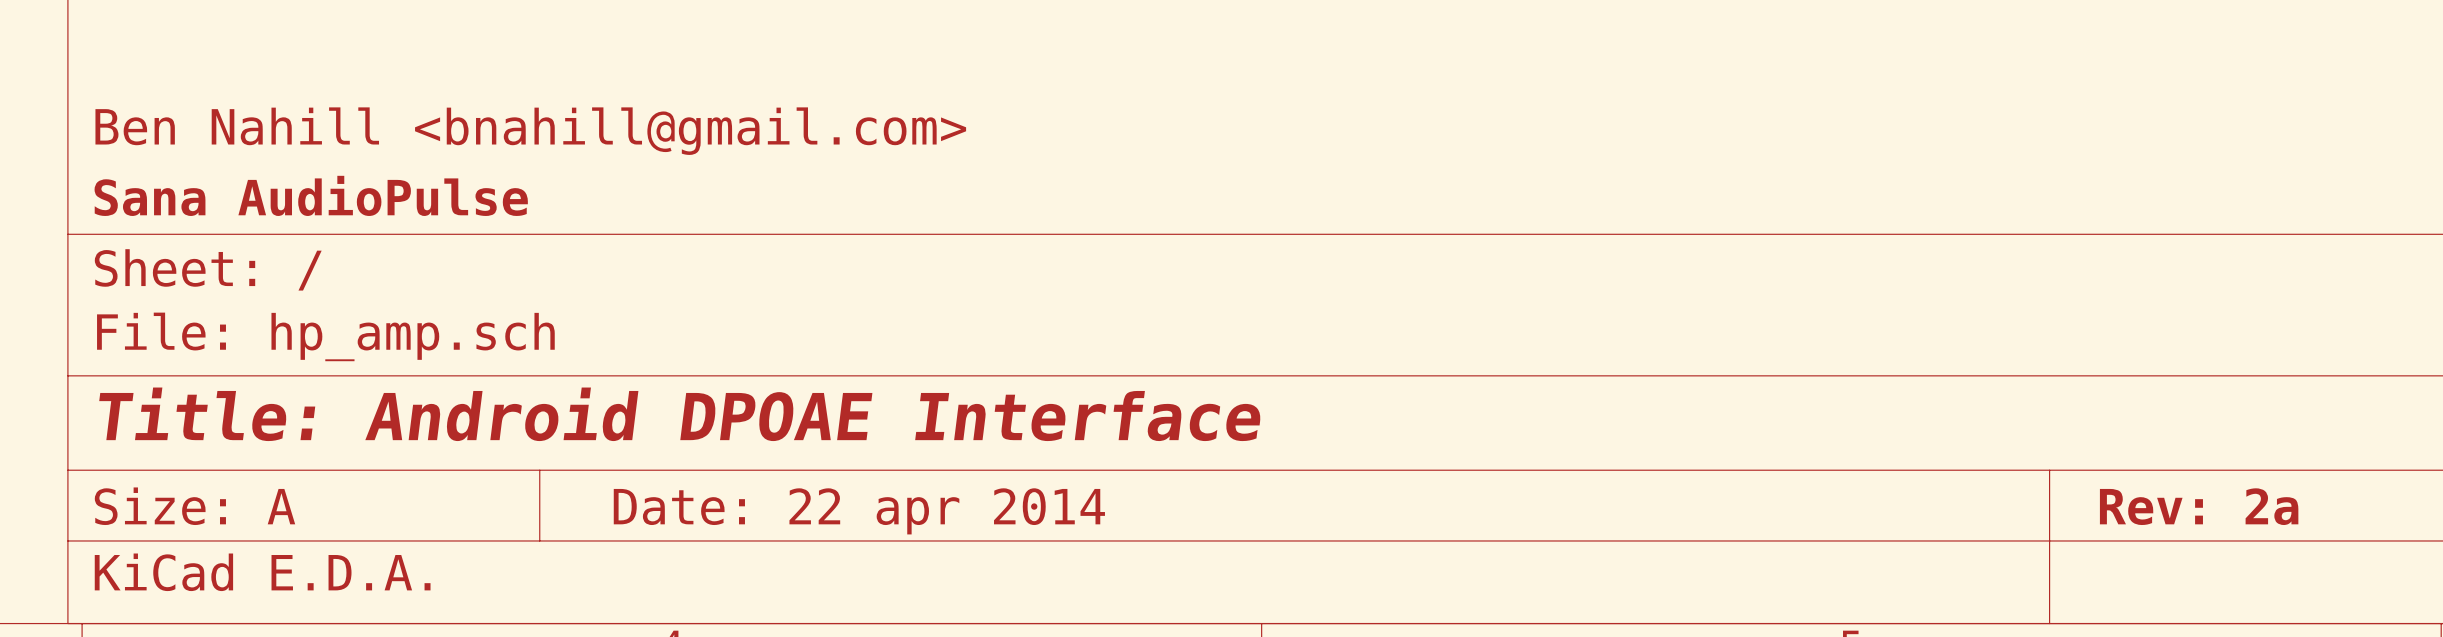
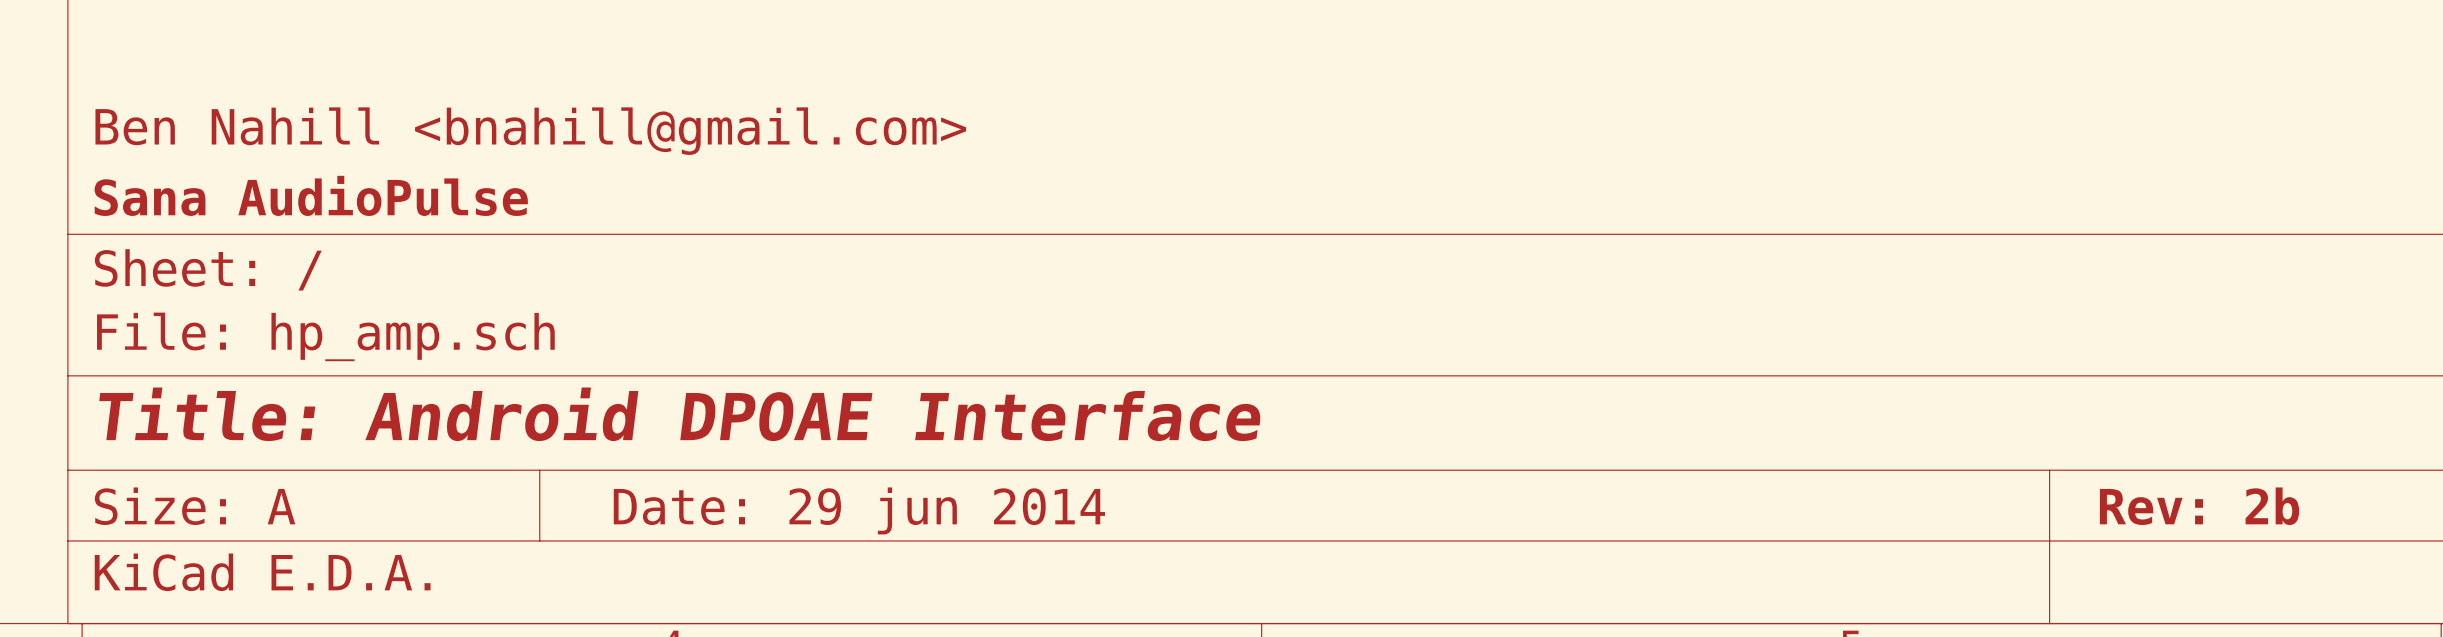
title block: Rev: 2a (2199, 506) -> Rev: 2b (2199, 506)
title block: Date: 22 apr 2014 (859, 511) -> Date: 29 jun 2014 (859, 510)

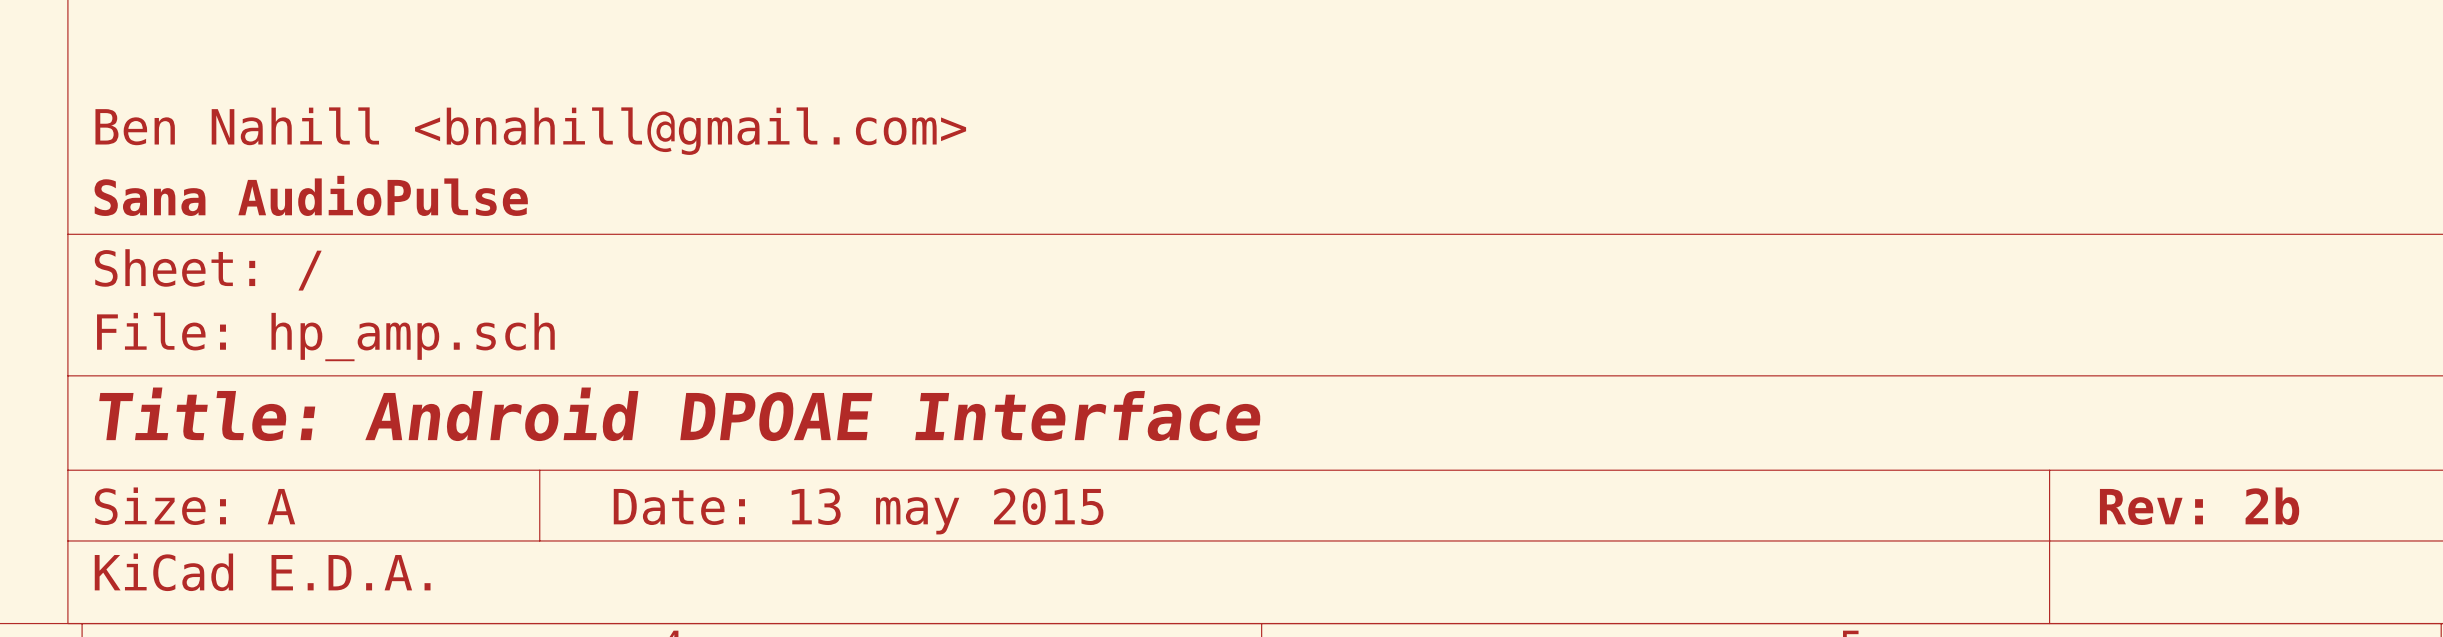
title block: Date: 29 jun 2014 (859, 510) -> Date: 13 may 2015 (858, 511)

